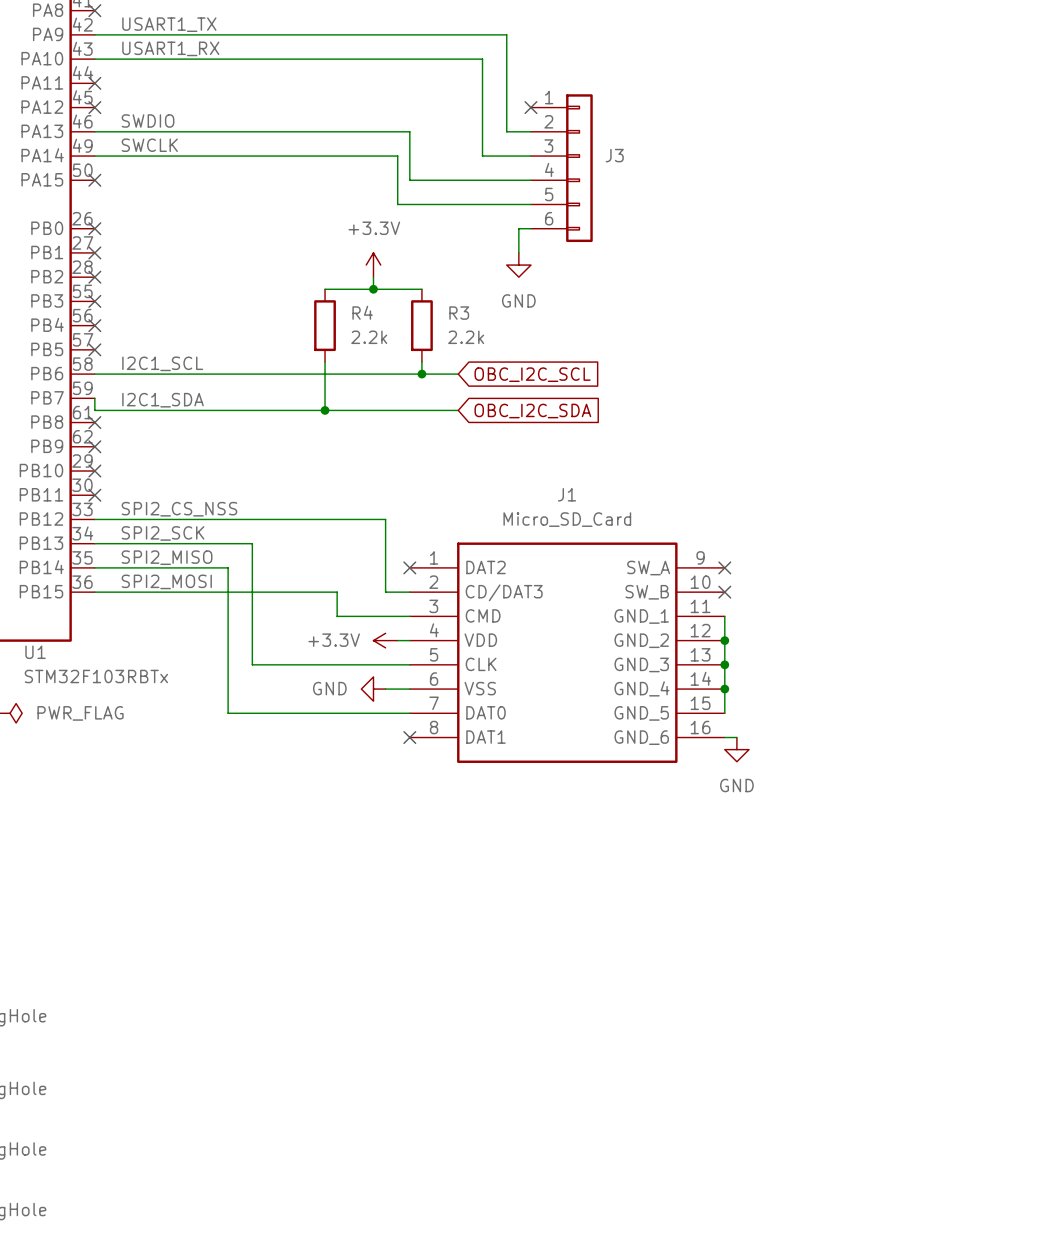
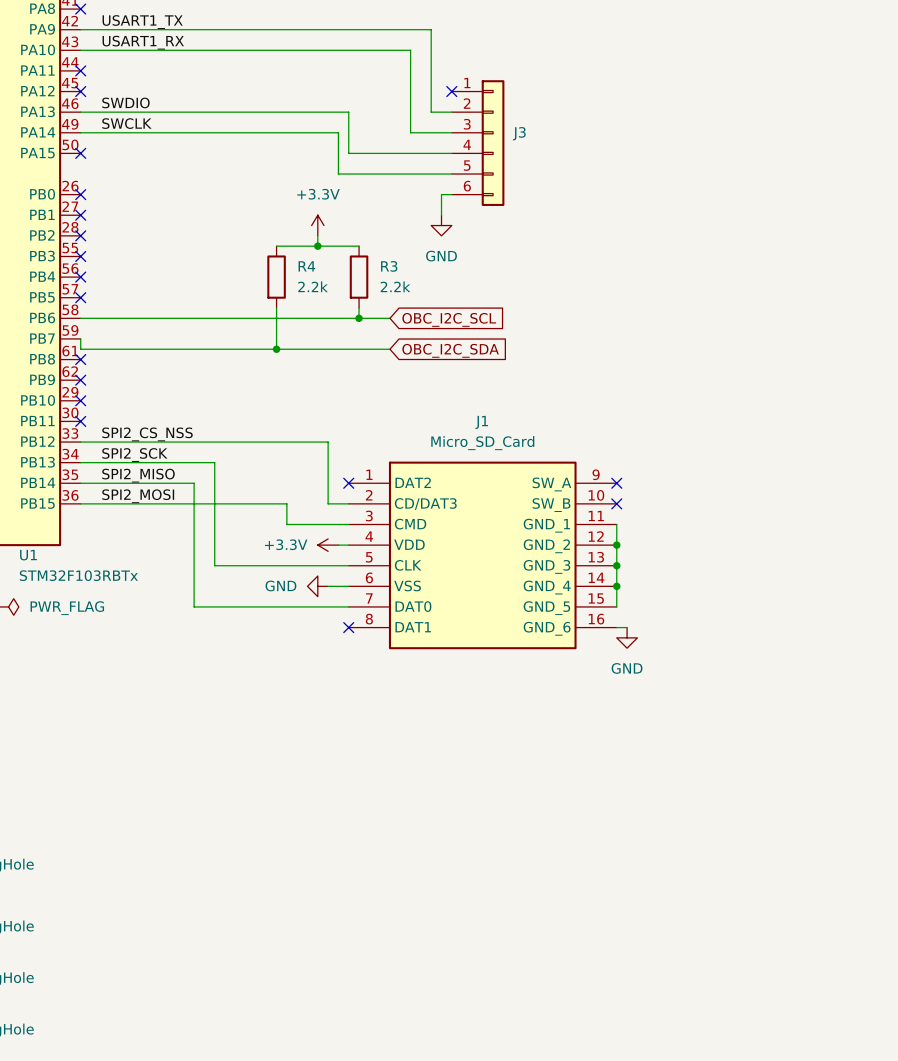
label: I2C1_SCL (162, 363) -> none
label: I2C1_SDA (163, 400) -> none

